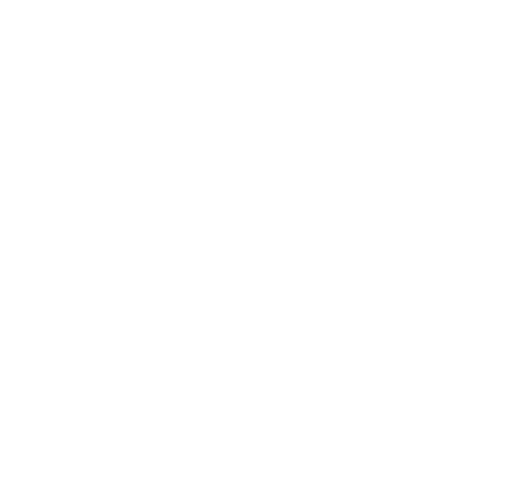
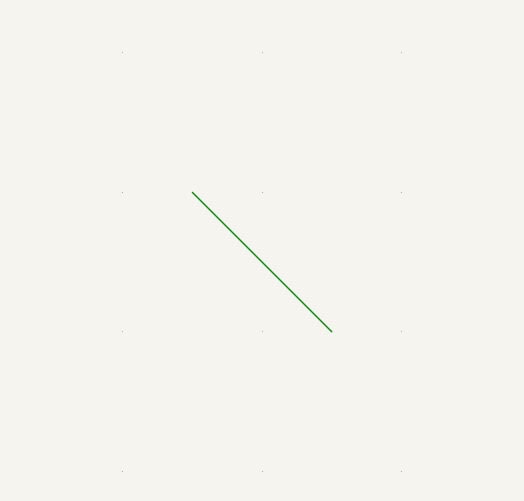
wire: none -> (192, 192) (331, 331)

